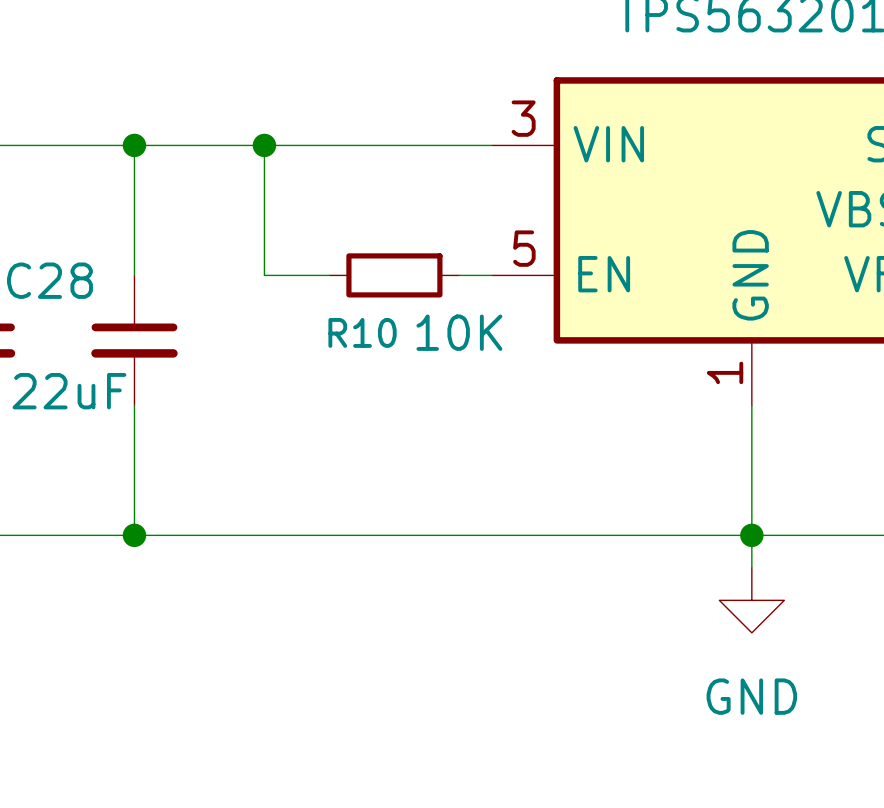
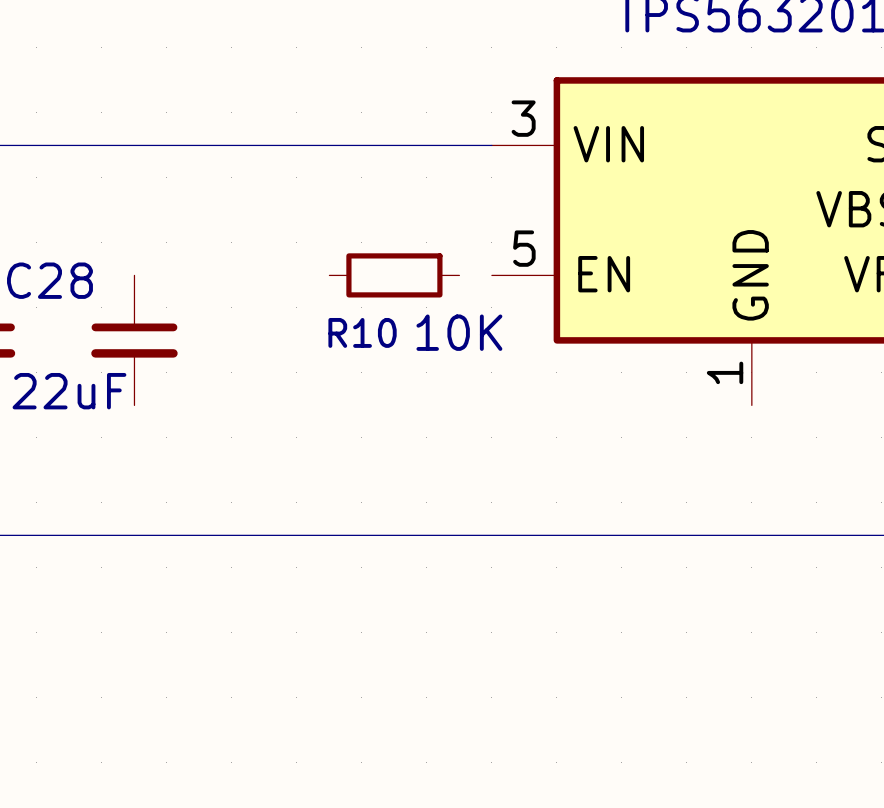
wire: (134, 145) (134, 275) -> none
junction: (134, 145) -> none
wire: (264, 145) (264, 275) (329, 275) -> none
junction: (264, 145) -> none
wire: (459, 275) (491, 275) -> none
wire: (134, 405) (134, 535) -> none
wire: (751, 405) (751, 567) -> none
junction: (134, 535) -> none
junction: (751, 535) -> none
power symbol: GND (751, 600) -> none

